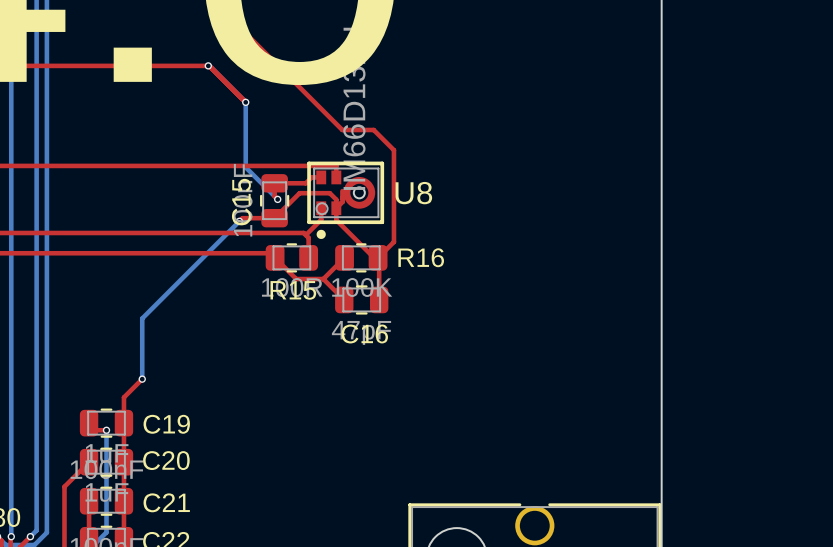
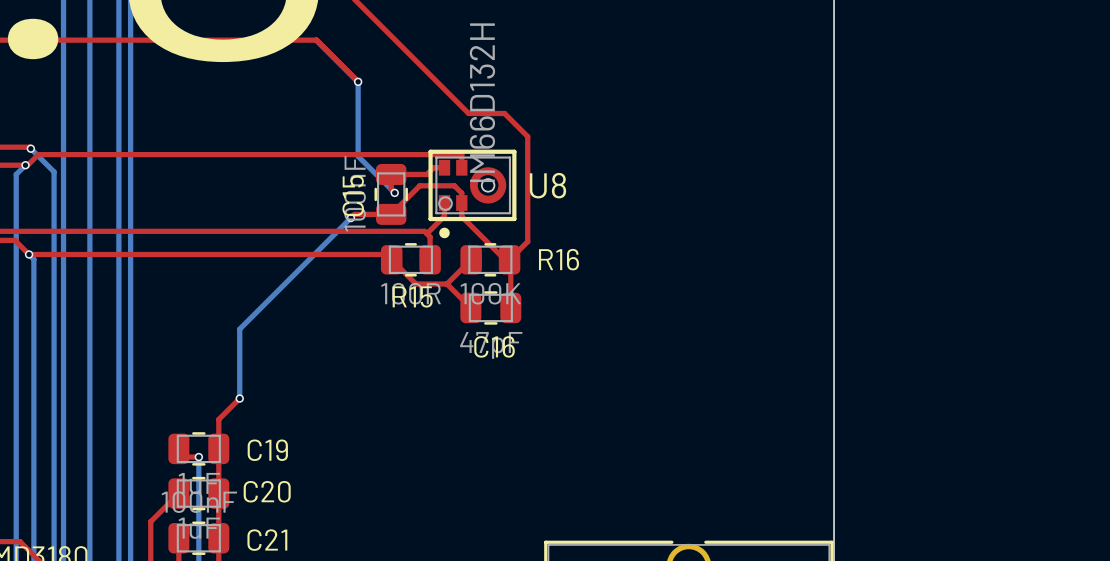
via: (208, 65) -> none
top track: (342, 191) (342, 201) (336, 208) -> none

